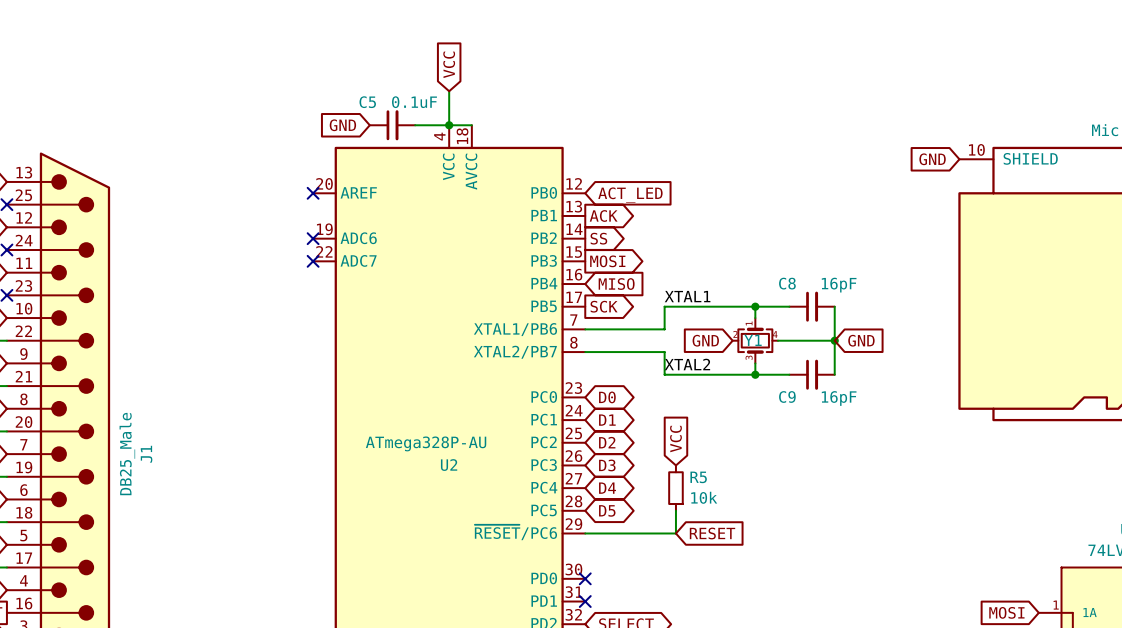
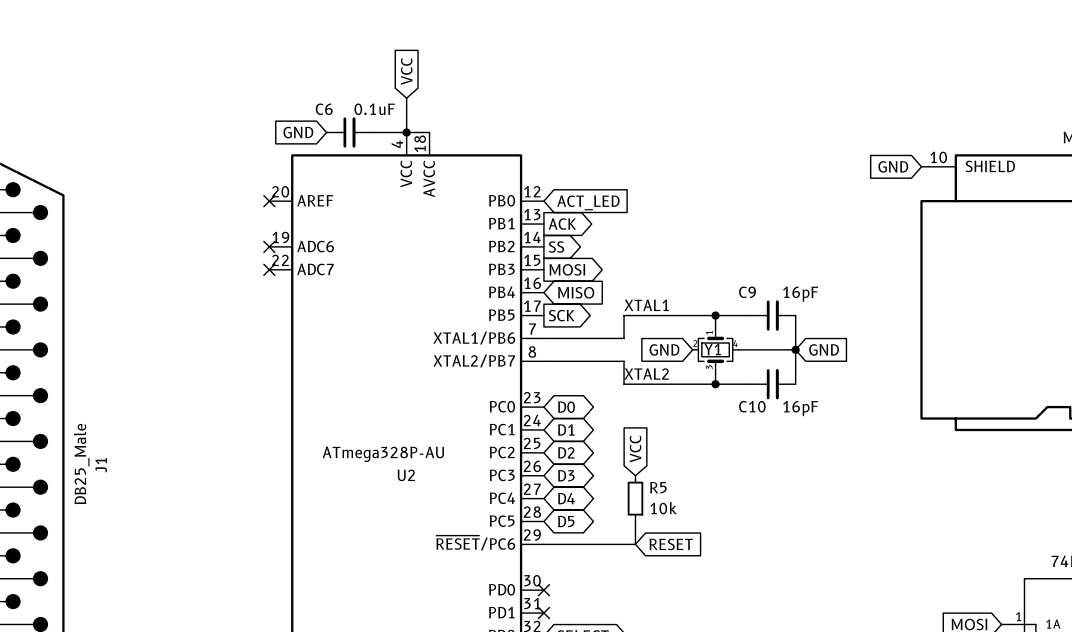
C5 name: C5 (367, 102) -> C6 (324, 109)
C8 name: C8 (787, 283) -> C9 (747, 292)
C9 name: C9 (787, 396) -> C10 (752, 406)

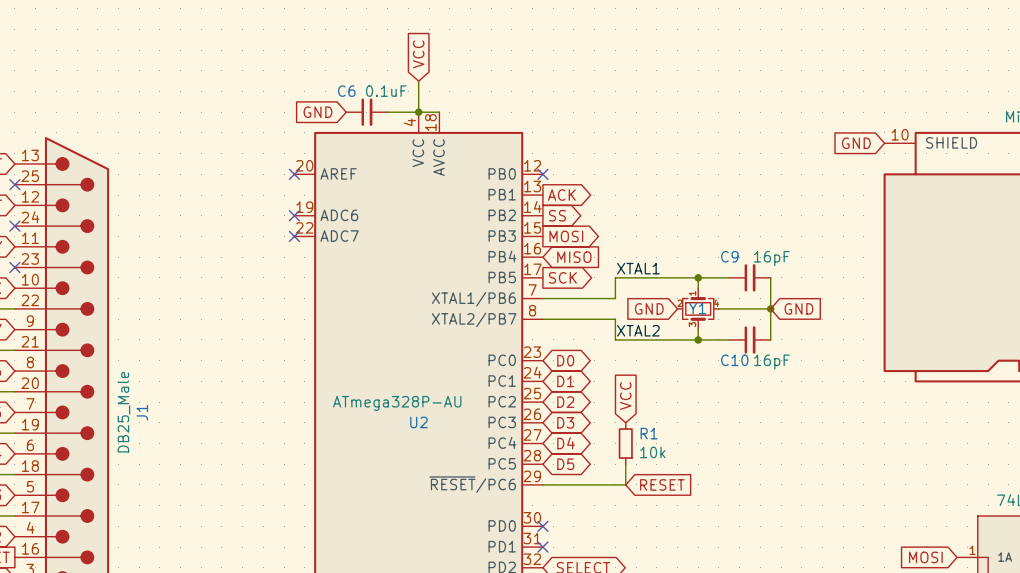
no-connect mark: none -> (542, 174)
global label: ACT_LED (588, 202) -> none
R5 name: R5 (658, 487) -> R1 (649, 433)

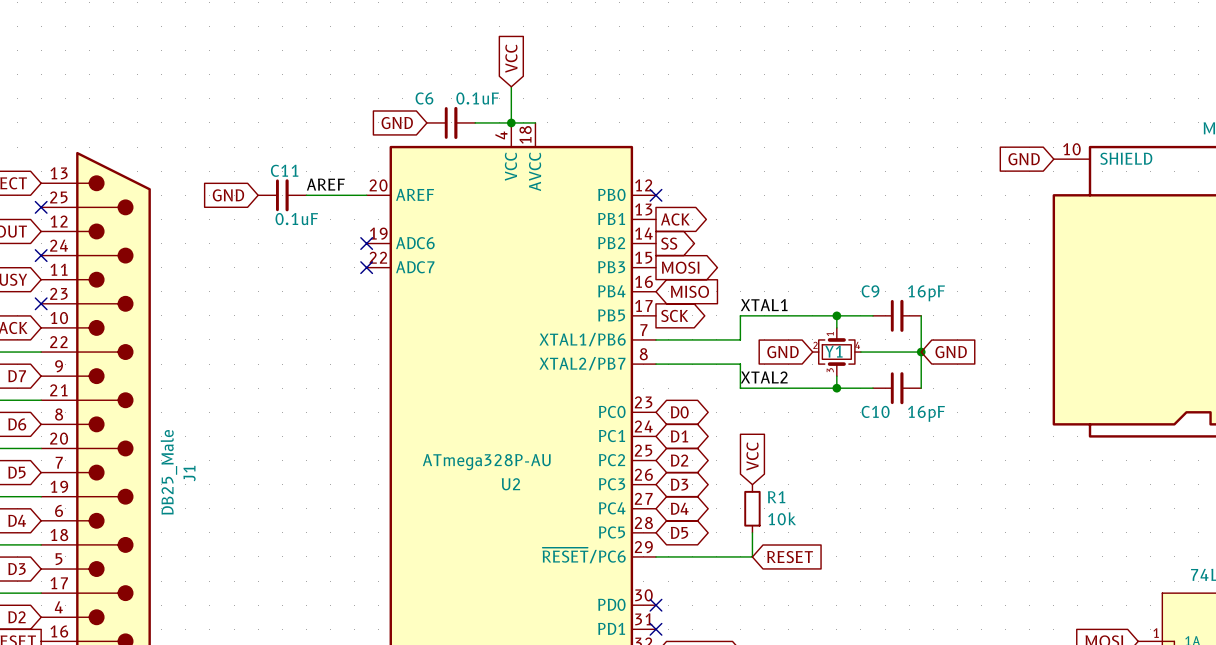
label: none -> AREF (325, 184)
global label: none -> GND (228, 195)
C11: none -> 0.1uF (282, 195)
wire: none -> (306, 195) (366, 195)
no-connect mark: (294, 174) -> none

